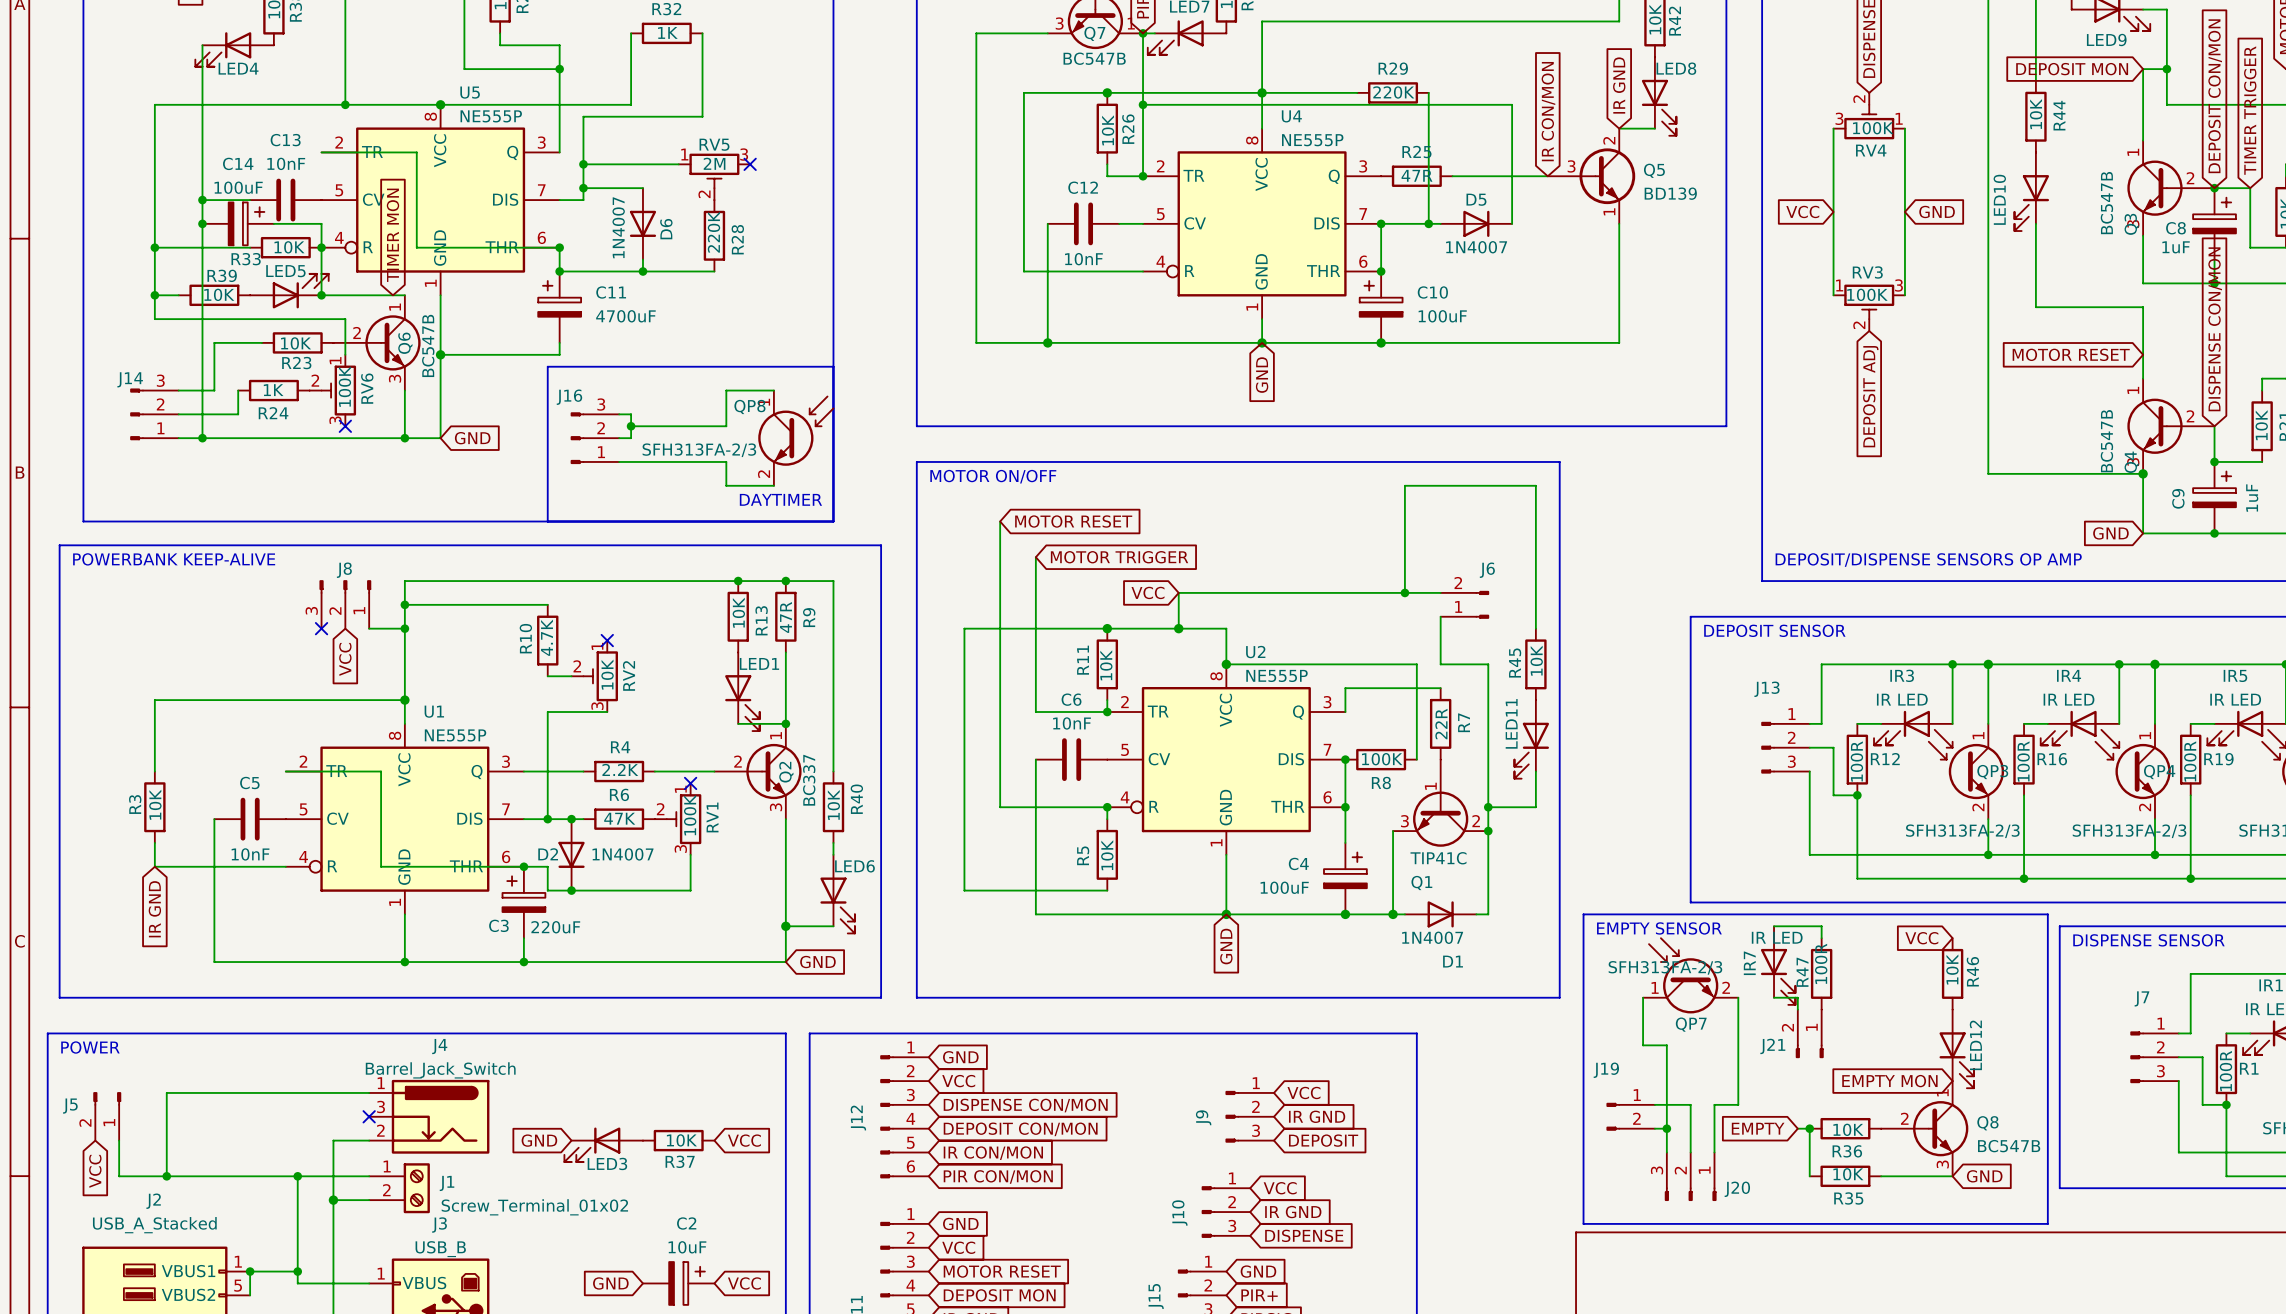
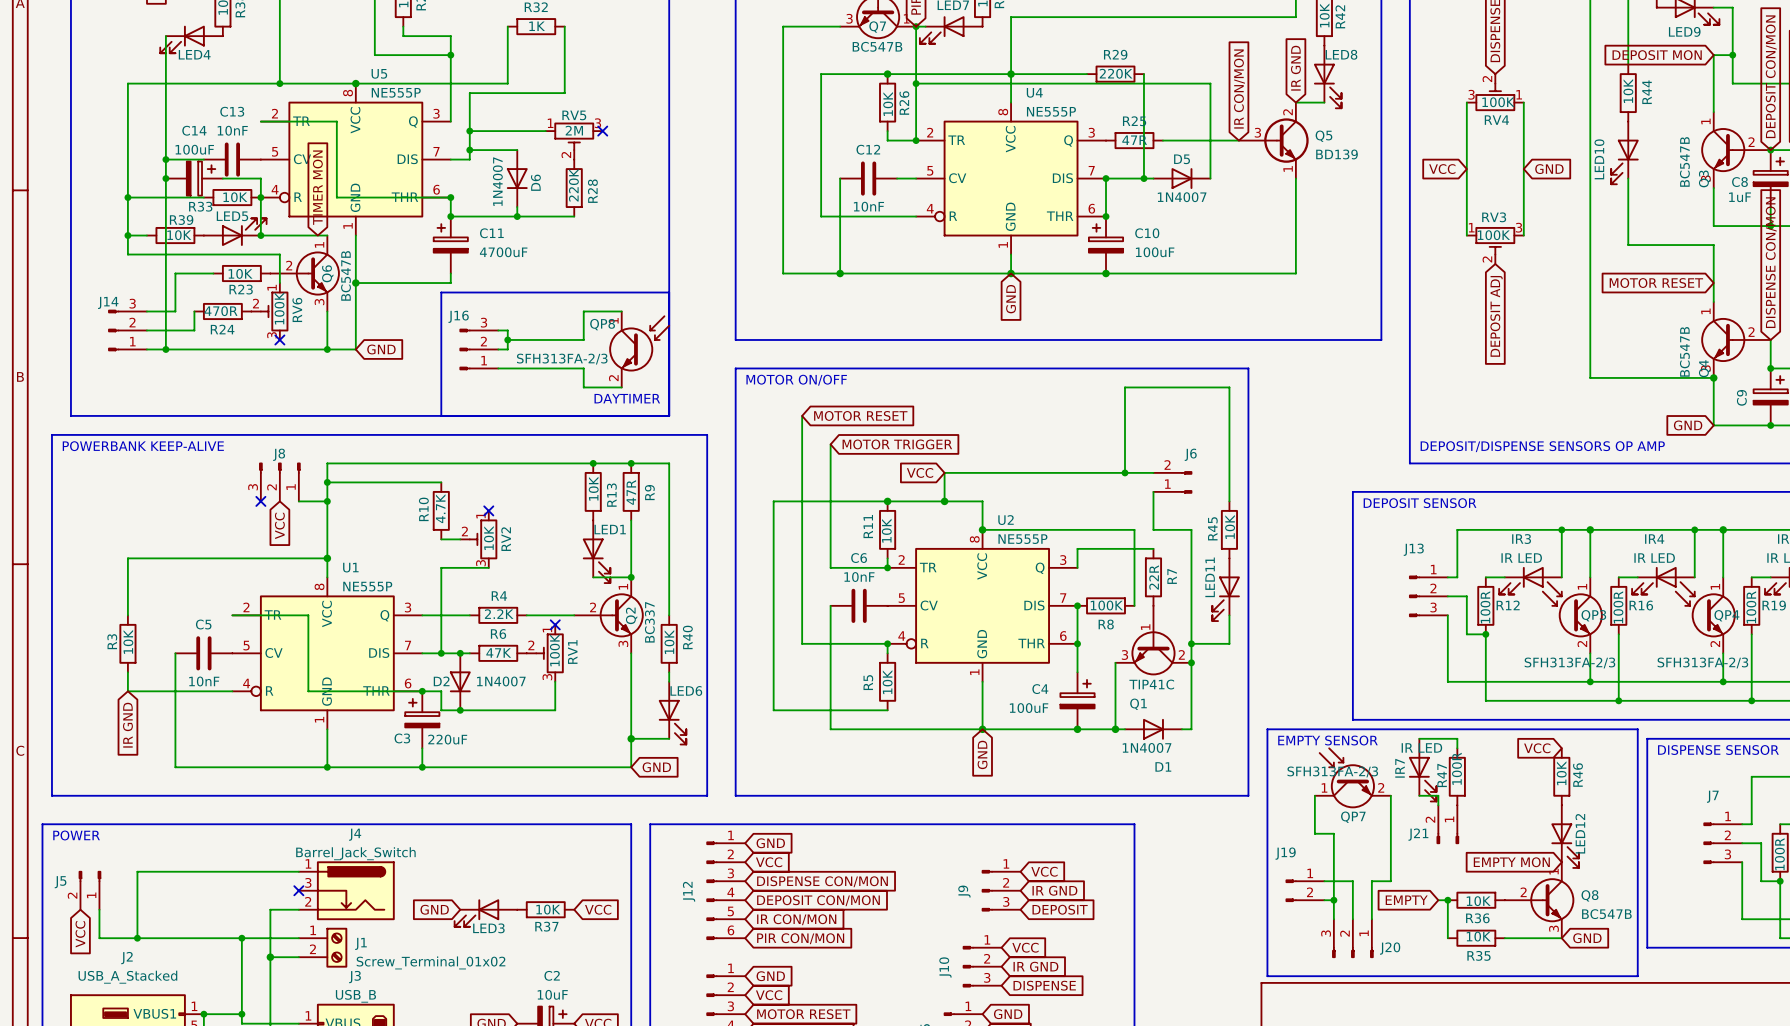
R24 value: 1K (273, 390) -> 470R (220, 311)

